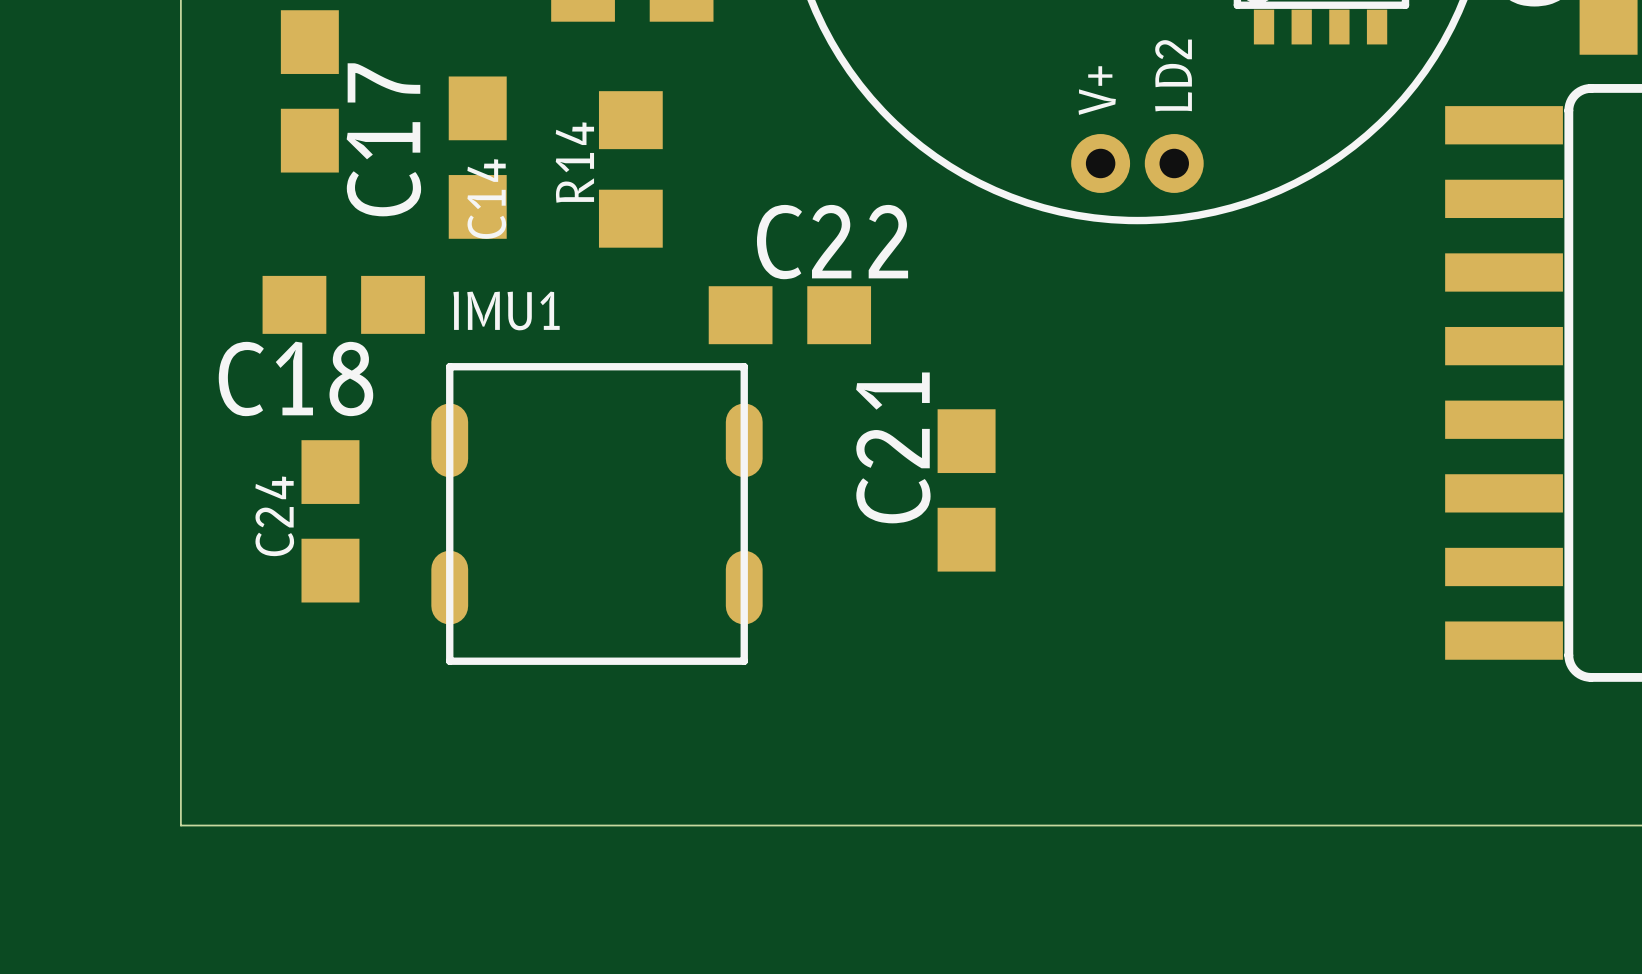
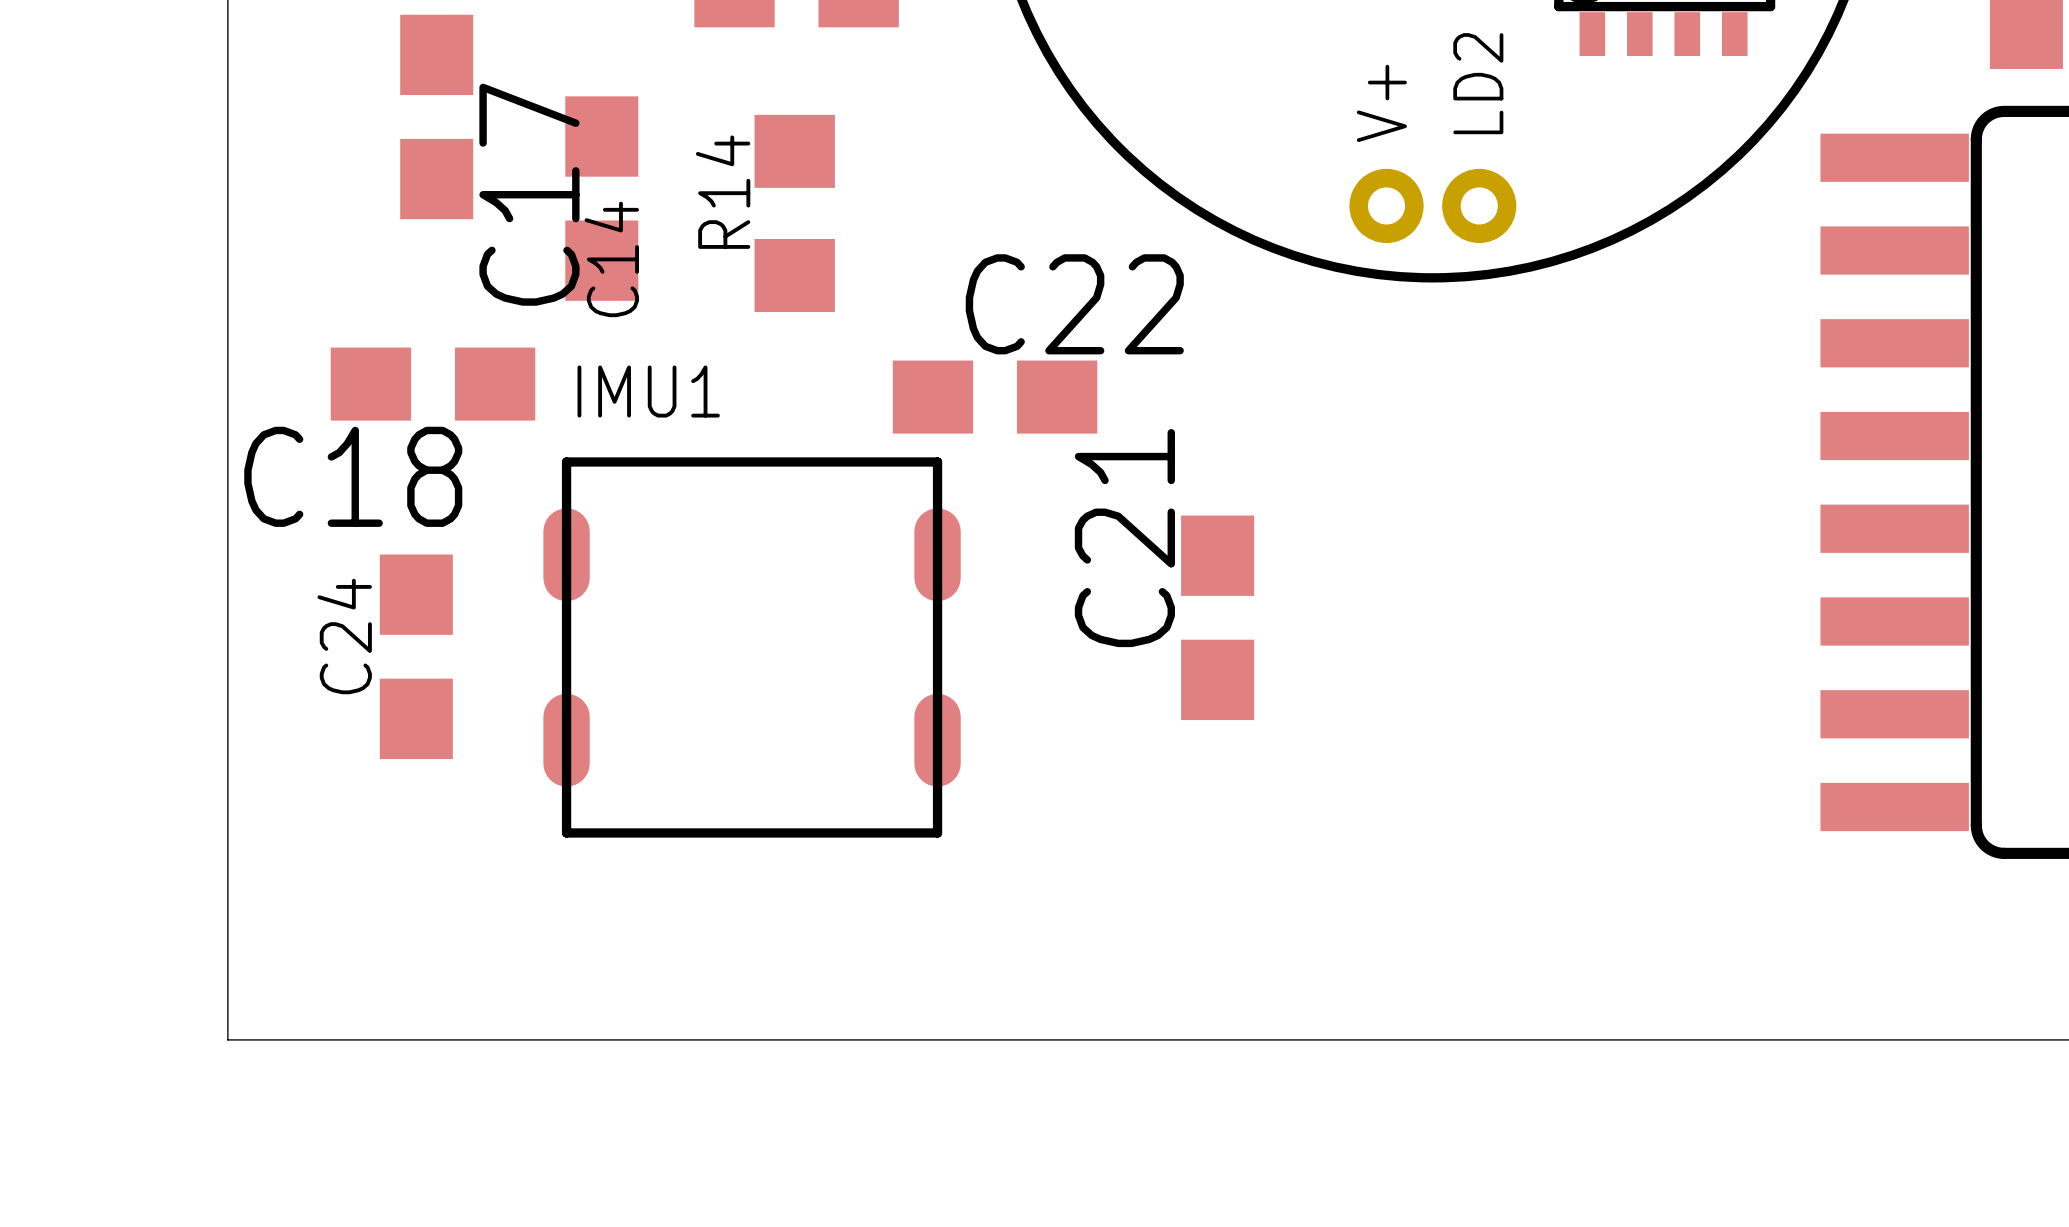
C17 position: (309, 91) -> (436, 116)

